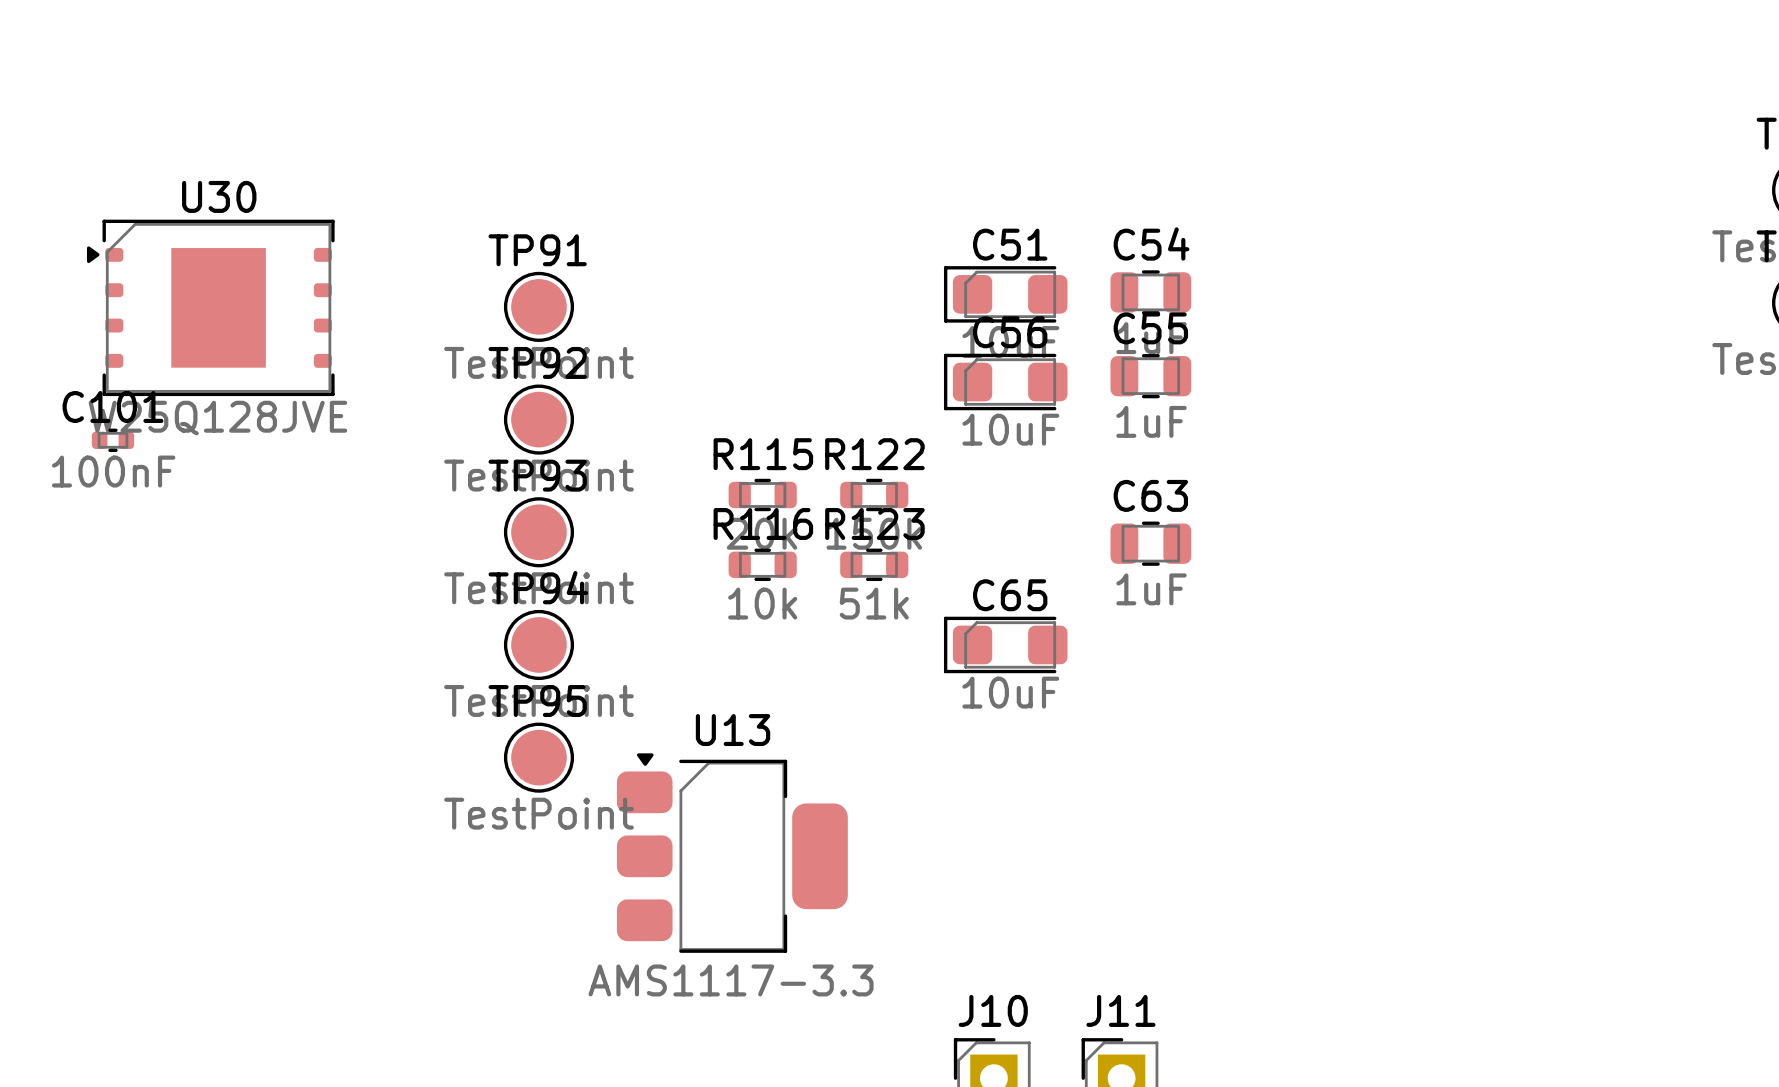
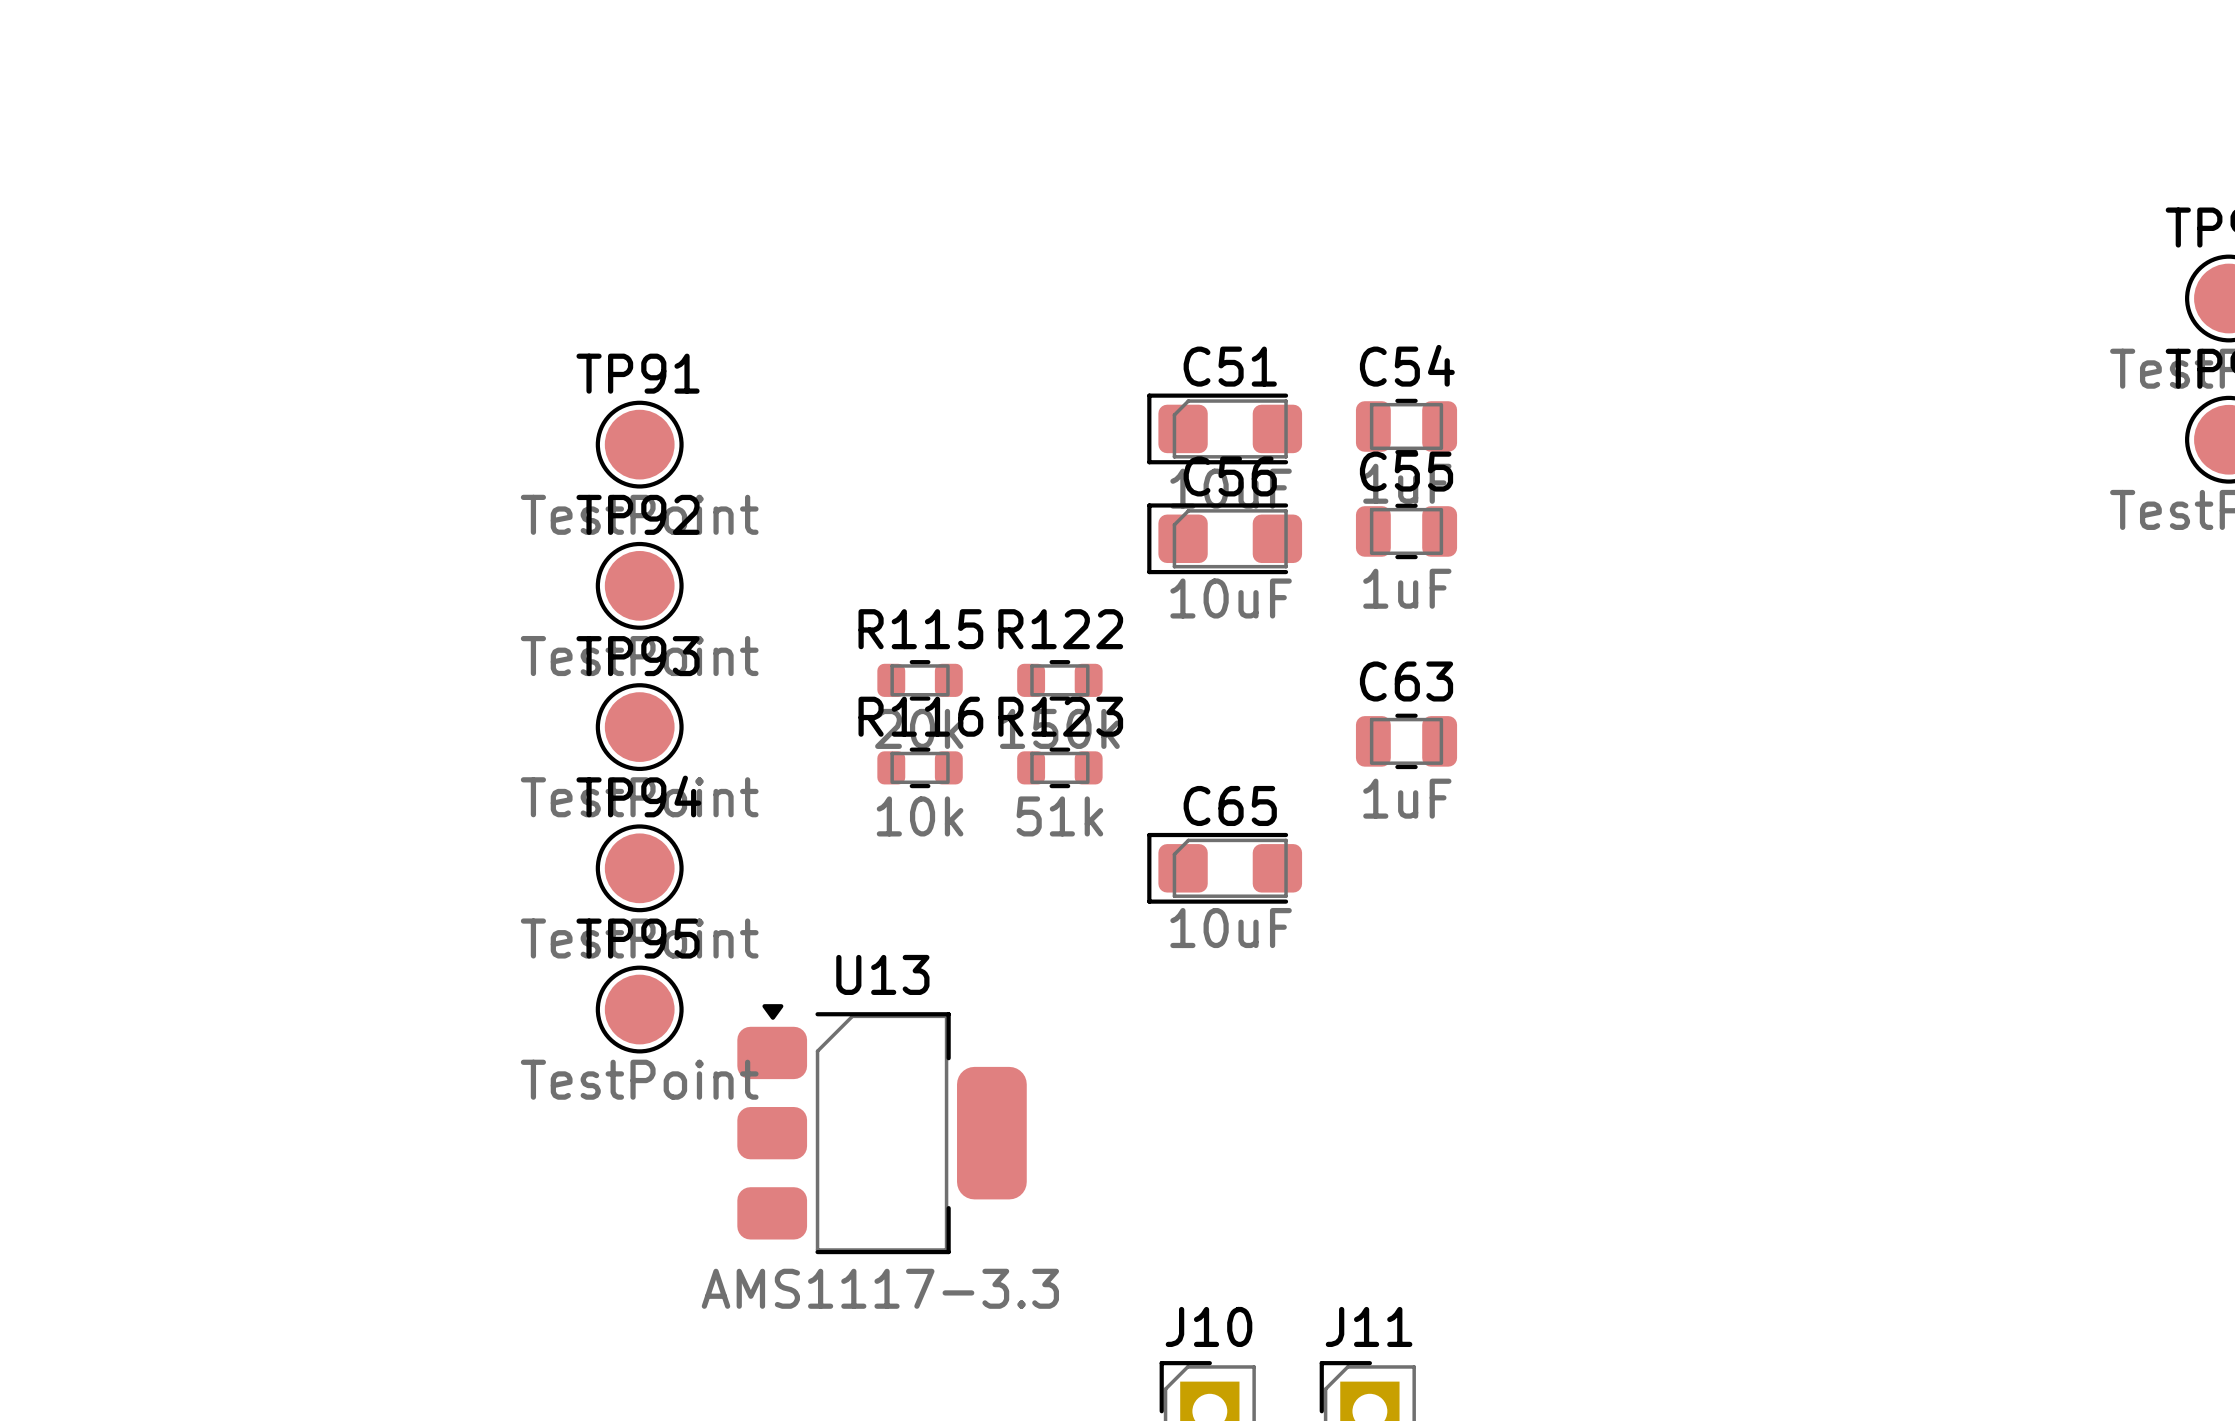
U30: W25Q128JVE (210, 307) -> none
C101: 100nF (112, 440) -> none

